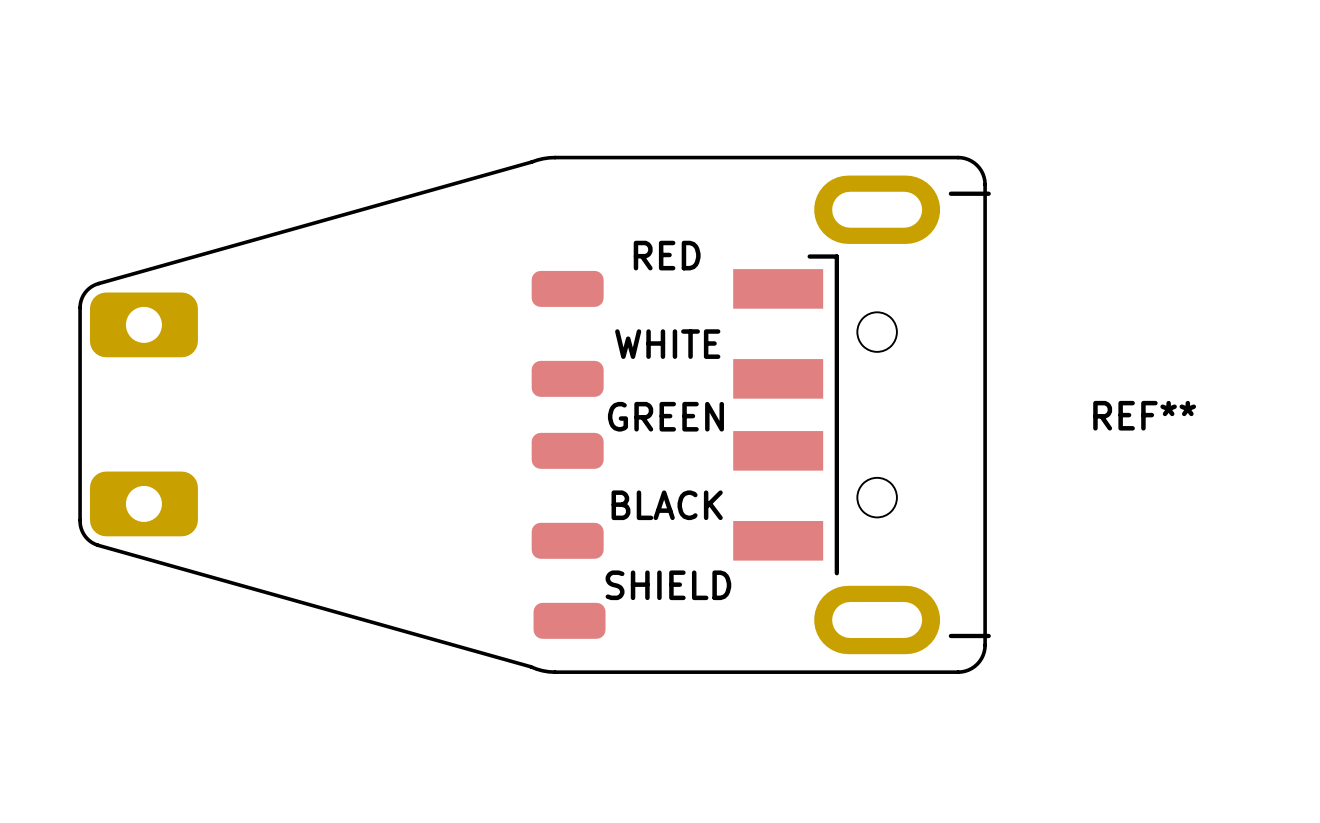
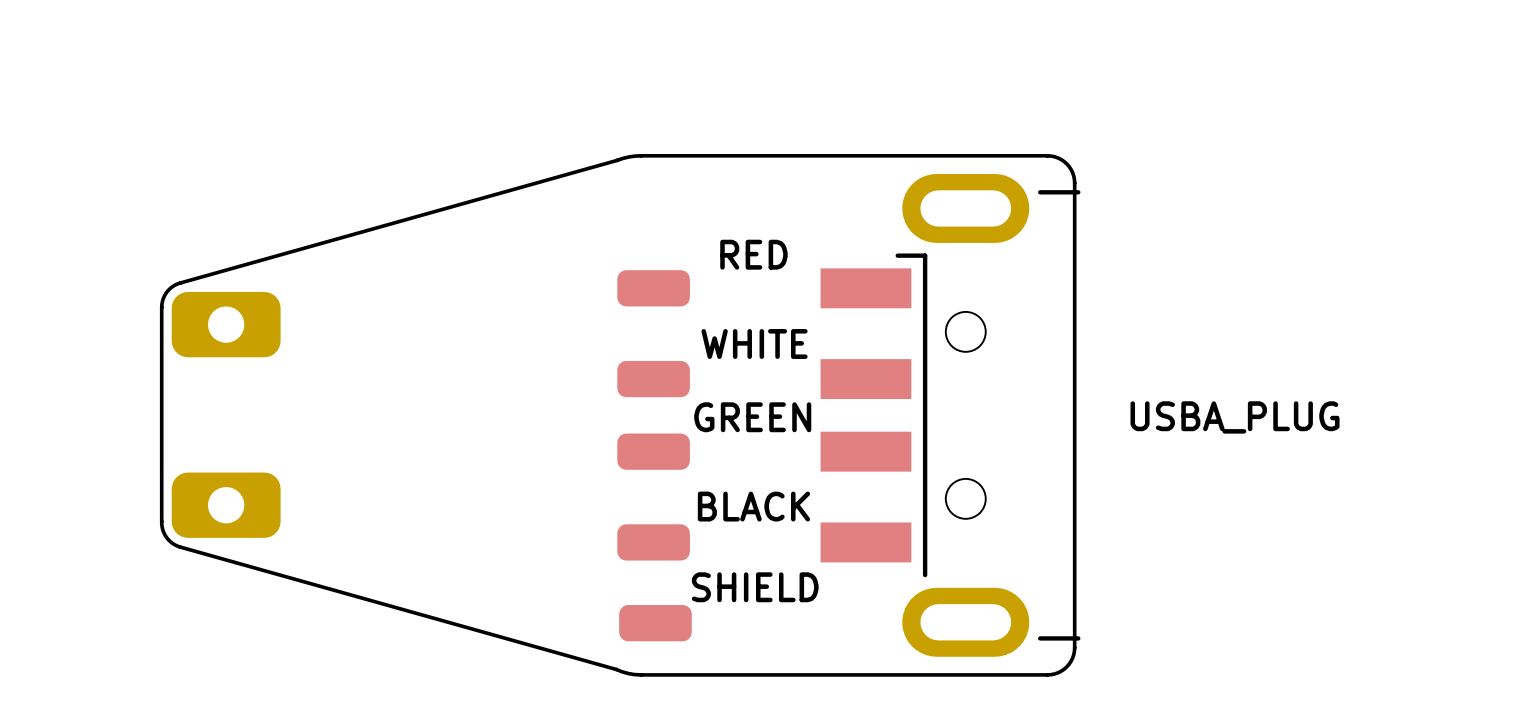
REF** name: REF** (1144, 415) -> USBA_PLUG (1235, 417)

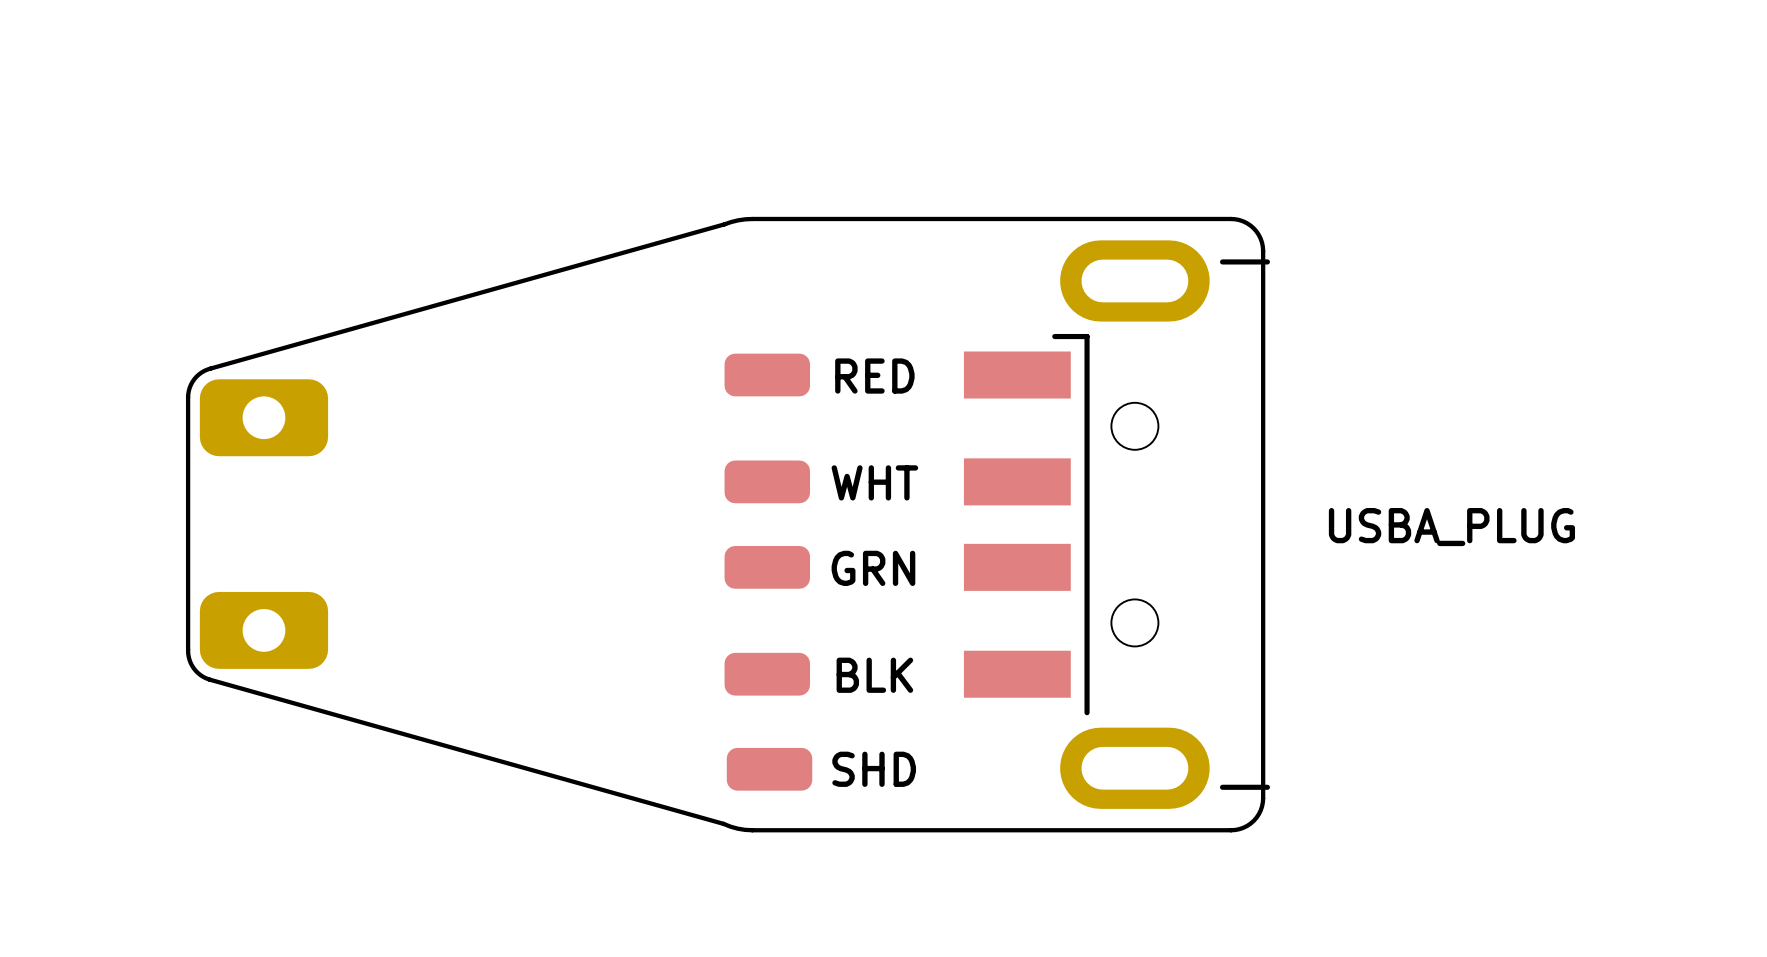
RED name: RED (753, 254) -> none
text: none -> RED (874, 376)
WHITE name: WHITE (754, 344) -> none
text: none -> WHT (874, 482)
GREEN name: GREEN (752, 417) -> none
text: none -> GRN (873, 568)
BLACK name: BLACK (753, 506) -> none
text: none -> BLK (874, 675)
SHIELD name: SHIELD (755, 587) -> none
text: none -> SHD (874, 769)

